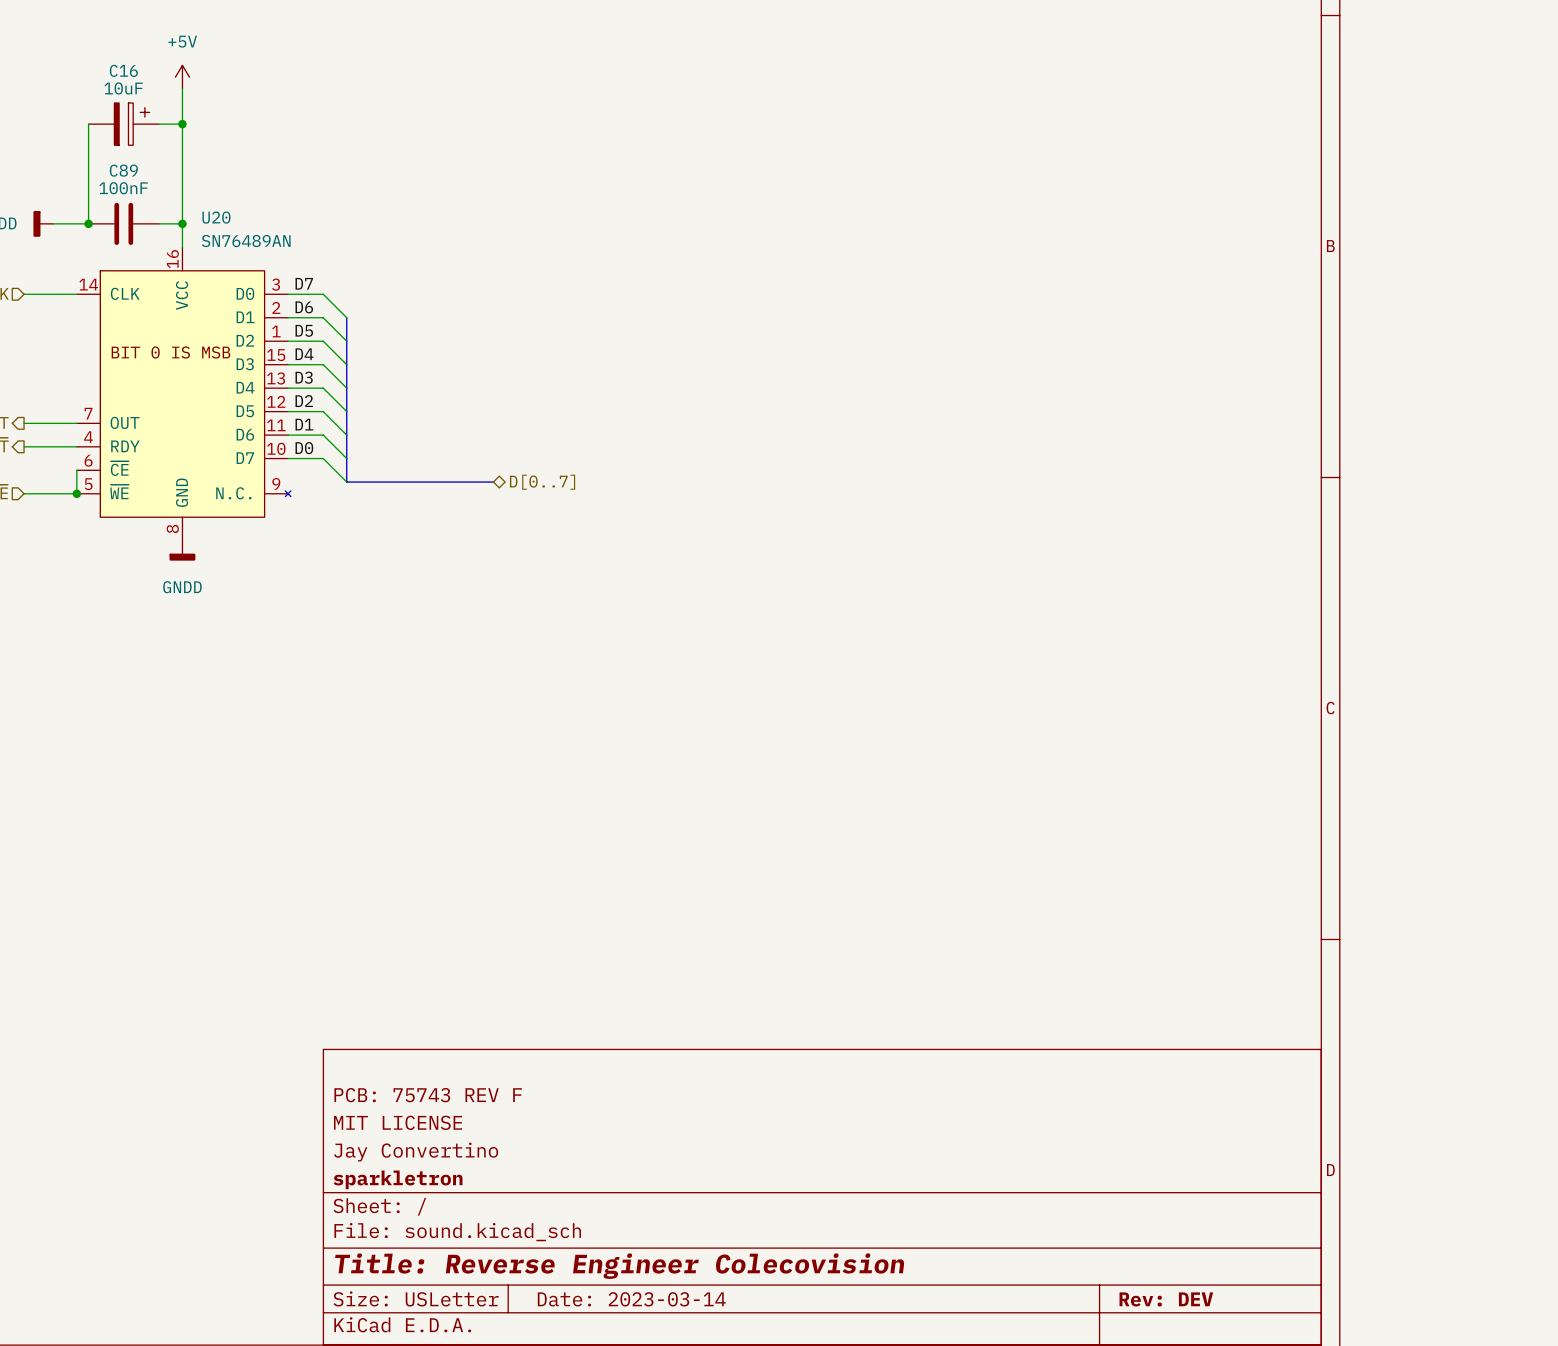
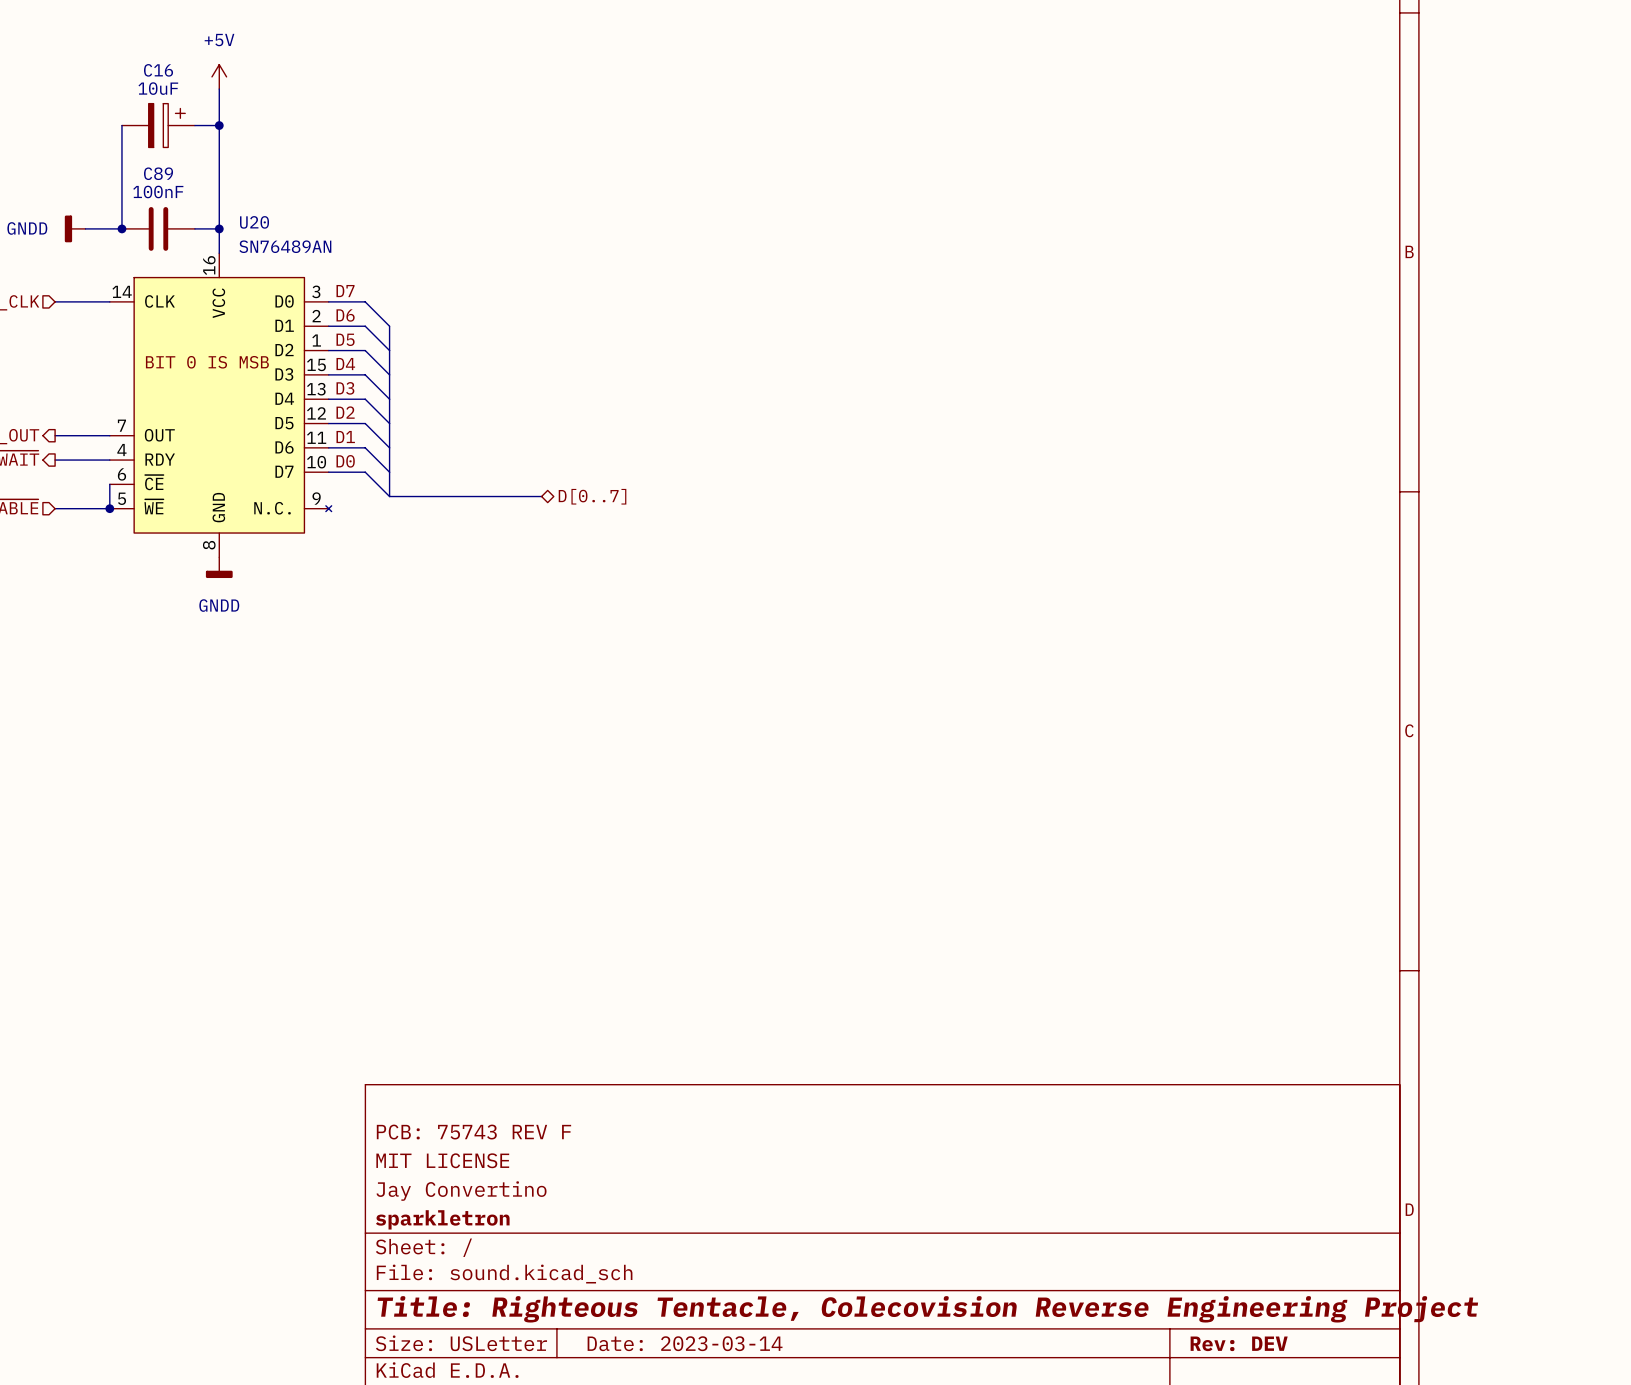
title block: Title: Reverse Engineer Colecovision (619, 1266) -> Title: Righteous Tentacle, Colecovision Reverse Engineering Project (927, 1309)

